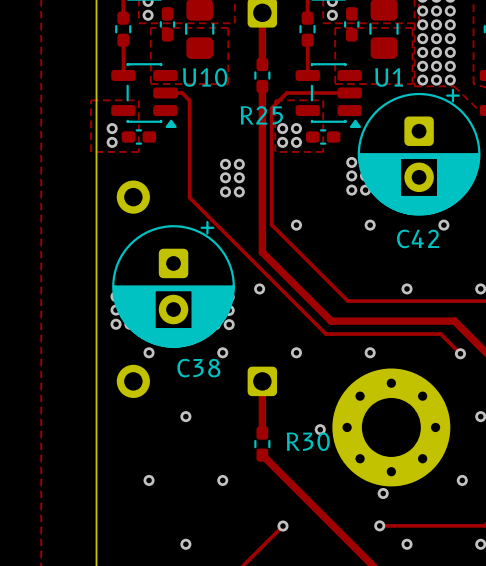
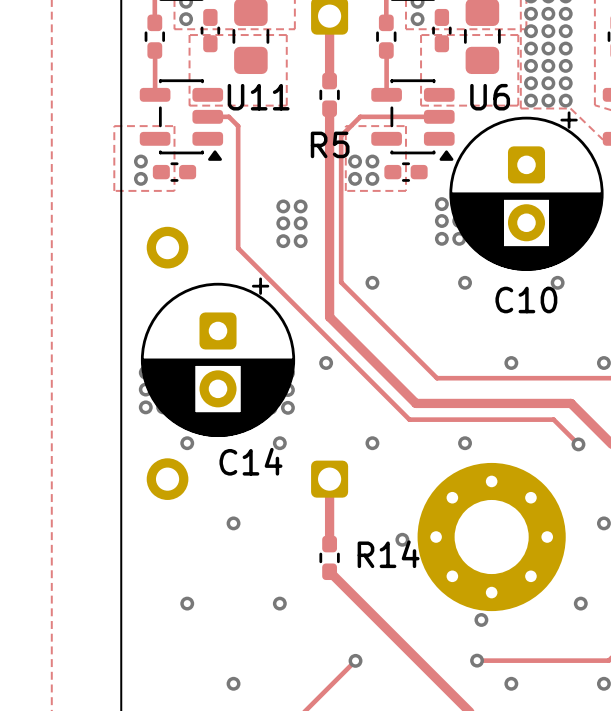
U10 name: U10 (205, 77) -> U11 (258, 97)
U1 name: U1 (389, 77) -> U6 (490, 97)
R25 name: R25 (261, 115) -> R5 (330, 144)
C42 name: C42 (418, 238) -> C10 (526, 300)
C38 name: C38 (198, 368) -> C14 (250, 461)
R30 name: R30 (308, 441) -> R14 (388, 554)

